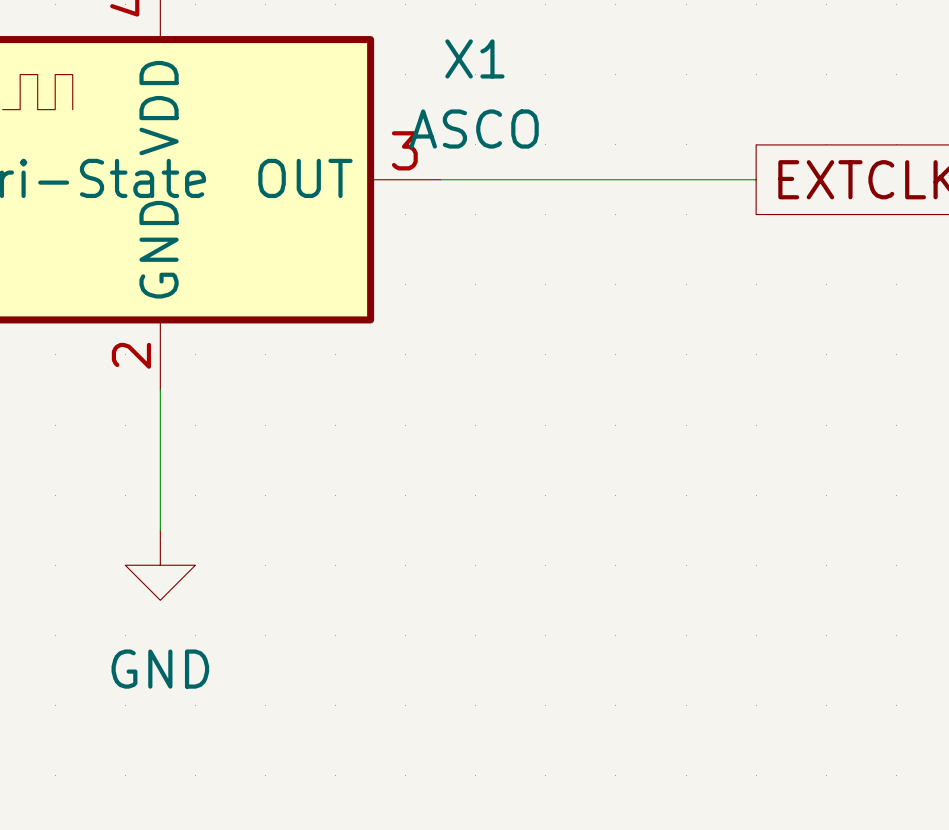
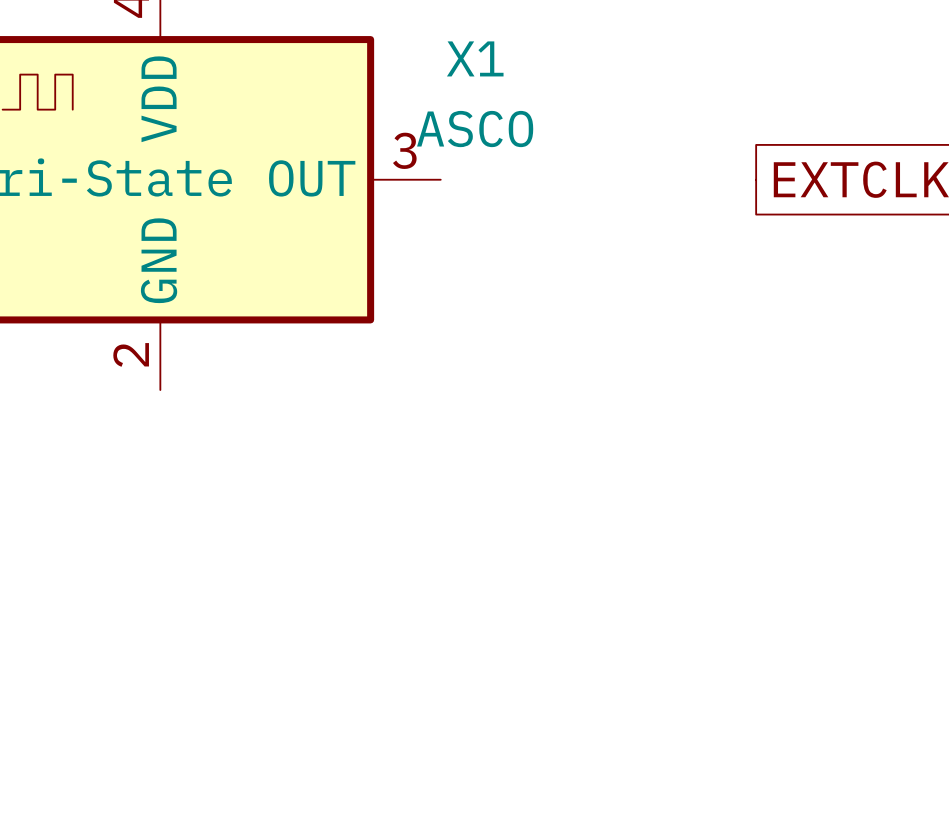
wire: (440, 179) (756, 179) -> none
wire: (160, 390) (160, 530) -> none
power symbol: GND (160, 565) -> none

